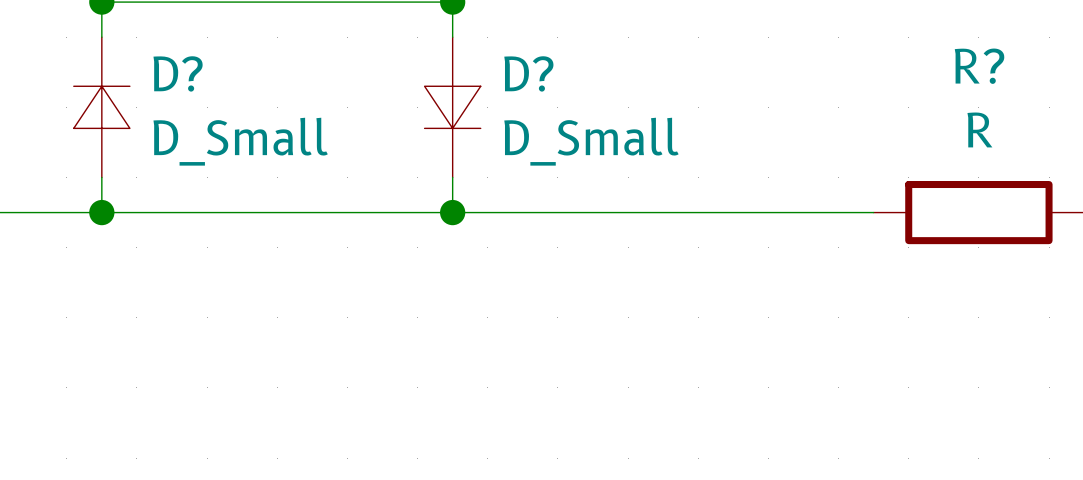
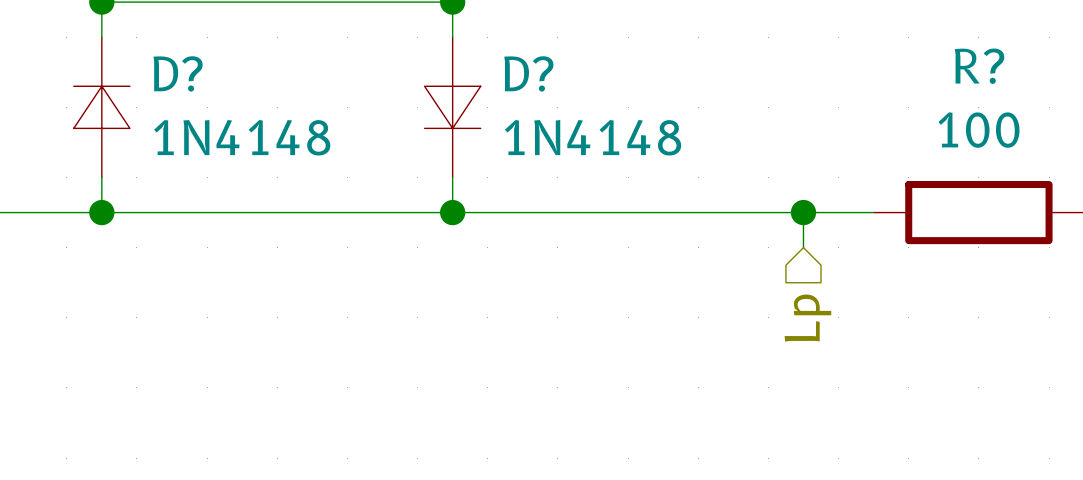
R? value: R (979, 129) -> 100 (978, 130)
D? value: D_Small (240, 141) -> 1N4148 (242, 137)
D? value: D_Small (591, 141) -> 1N4148 (593, 137)
wire: none -> (803, 212) (803, 247)
junction: none -> (803, 212)
hierarchical label: none -> Lp (807, 318)

